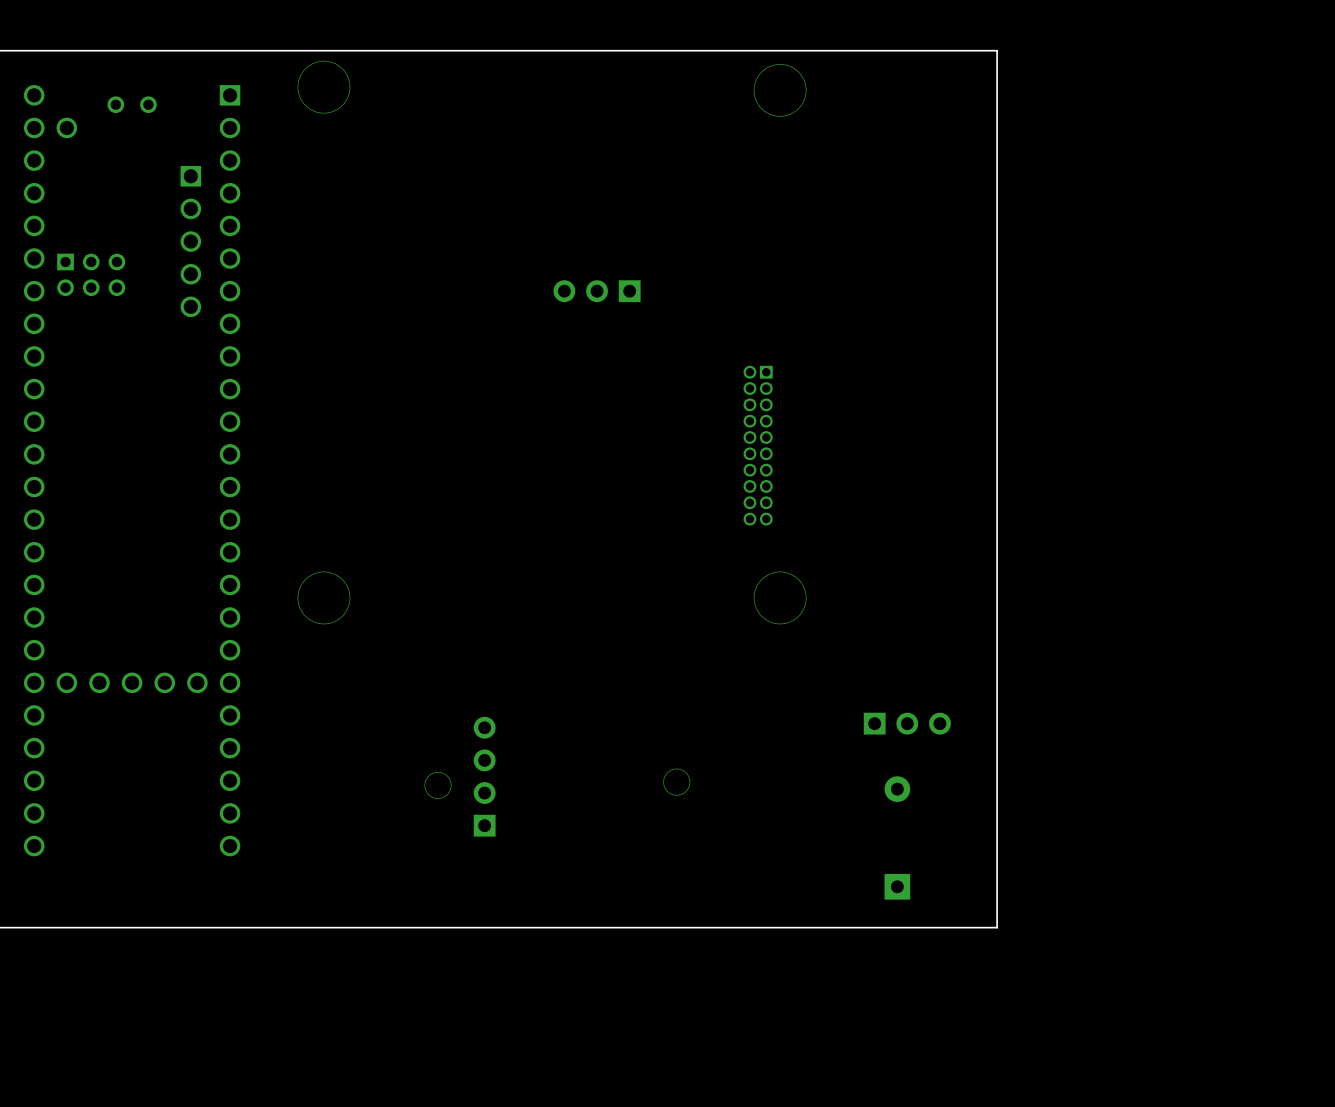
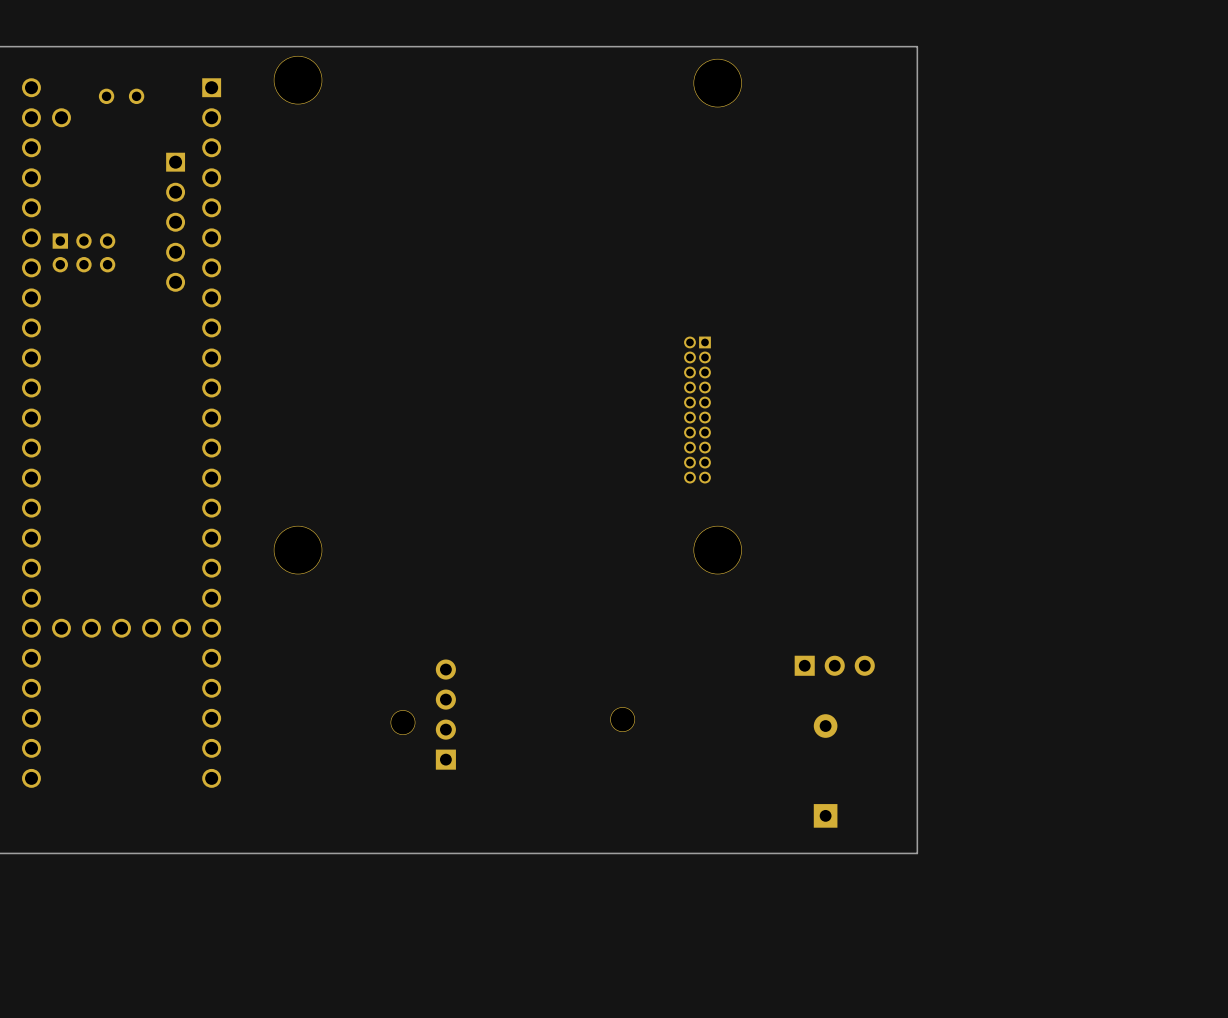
part: (597, 291) -> none

